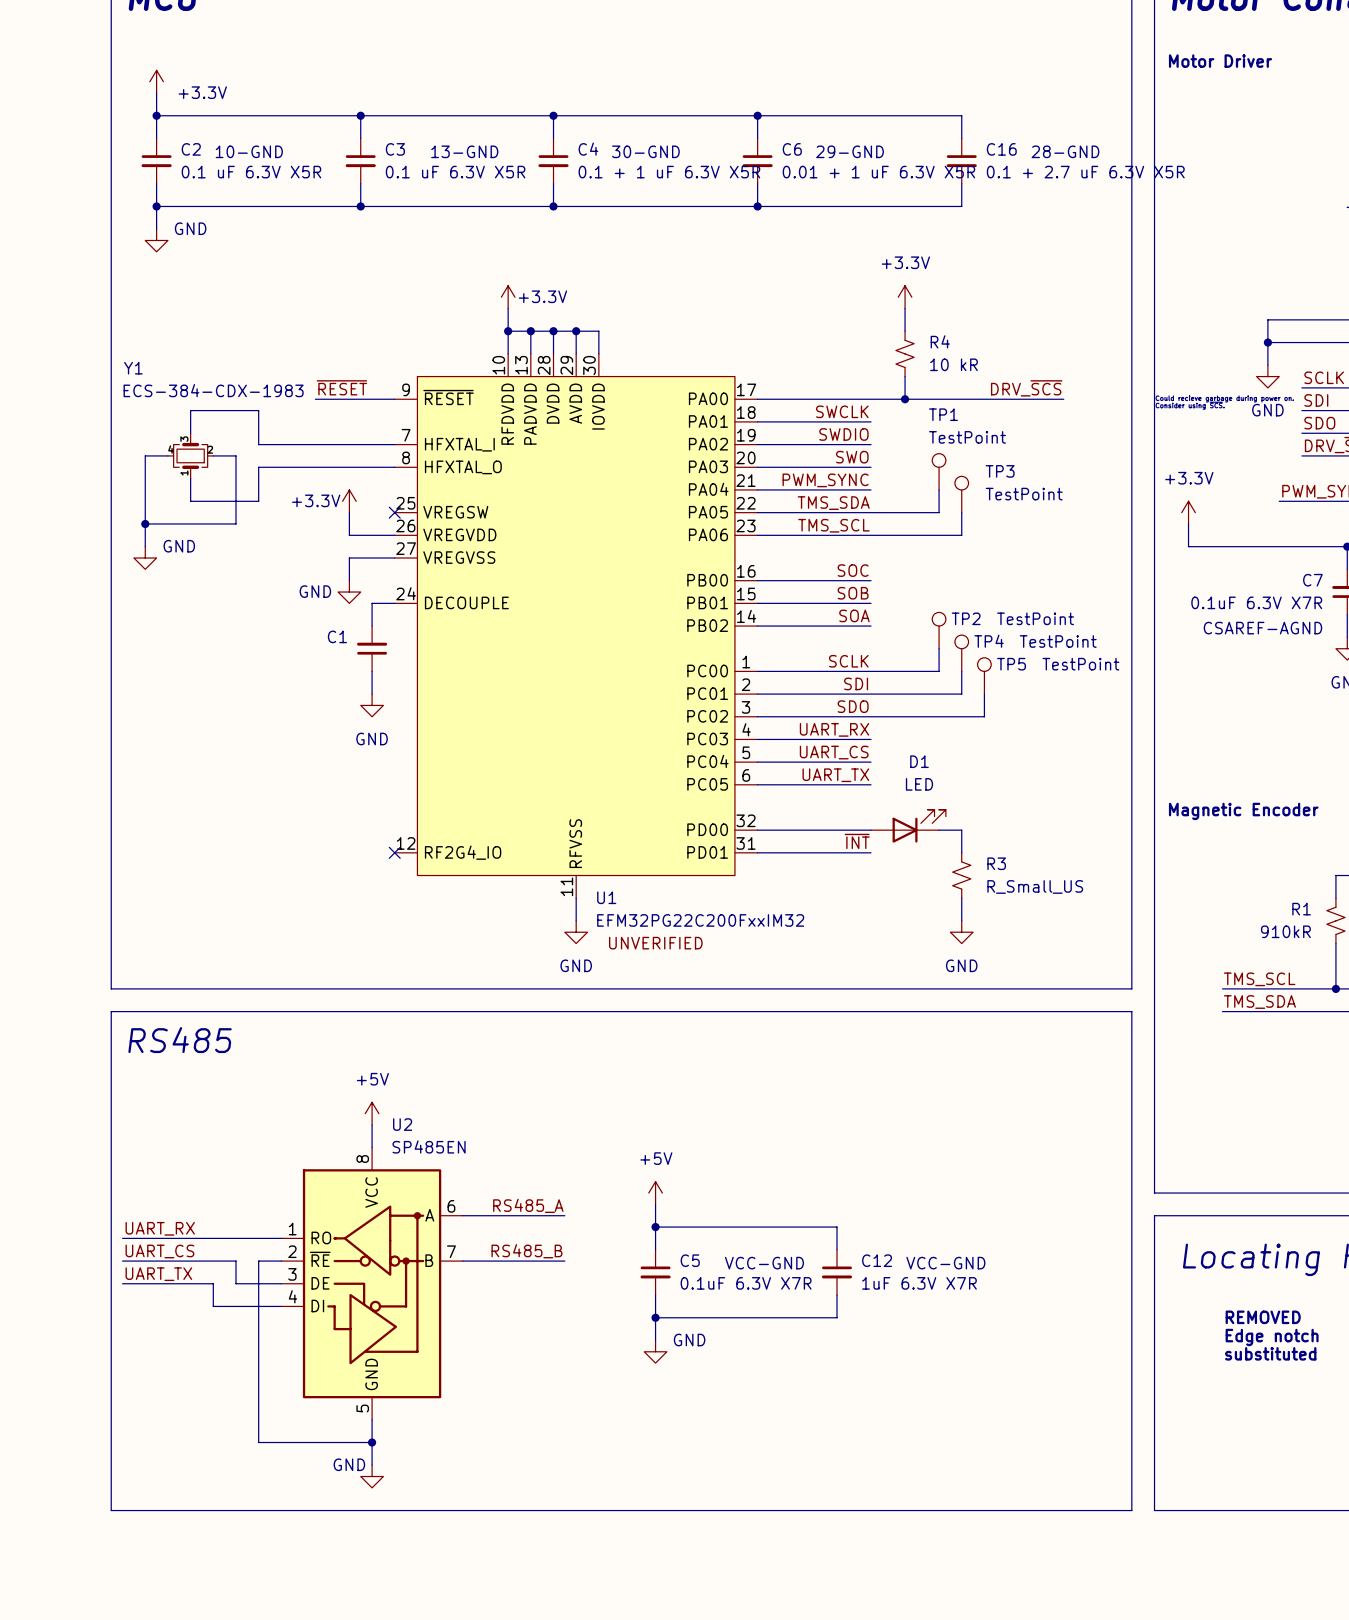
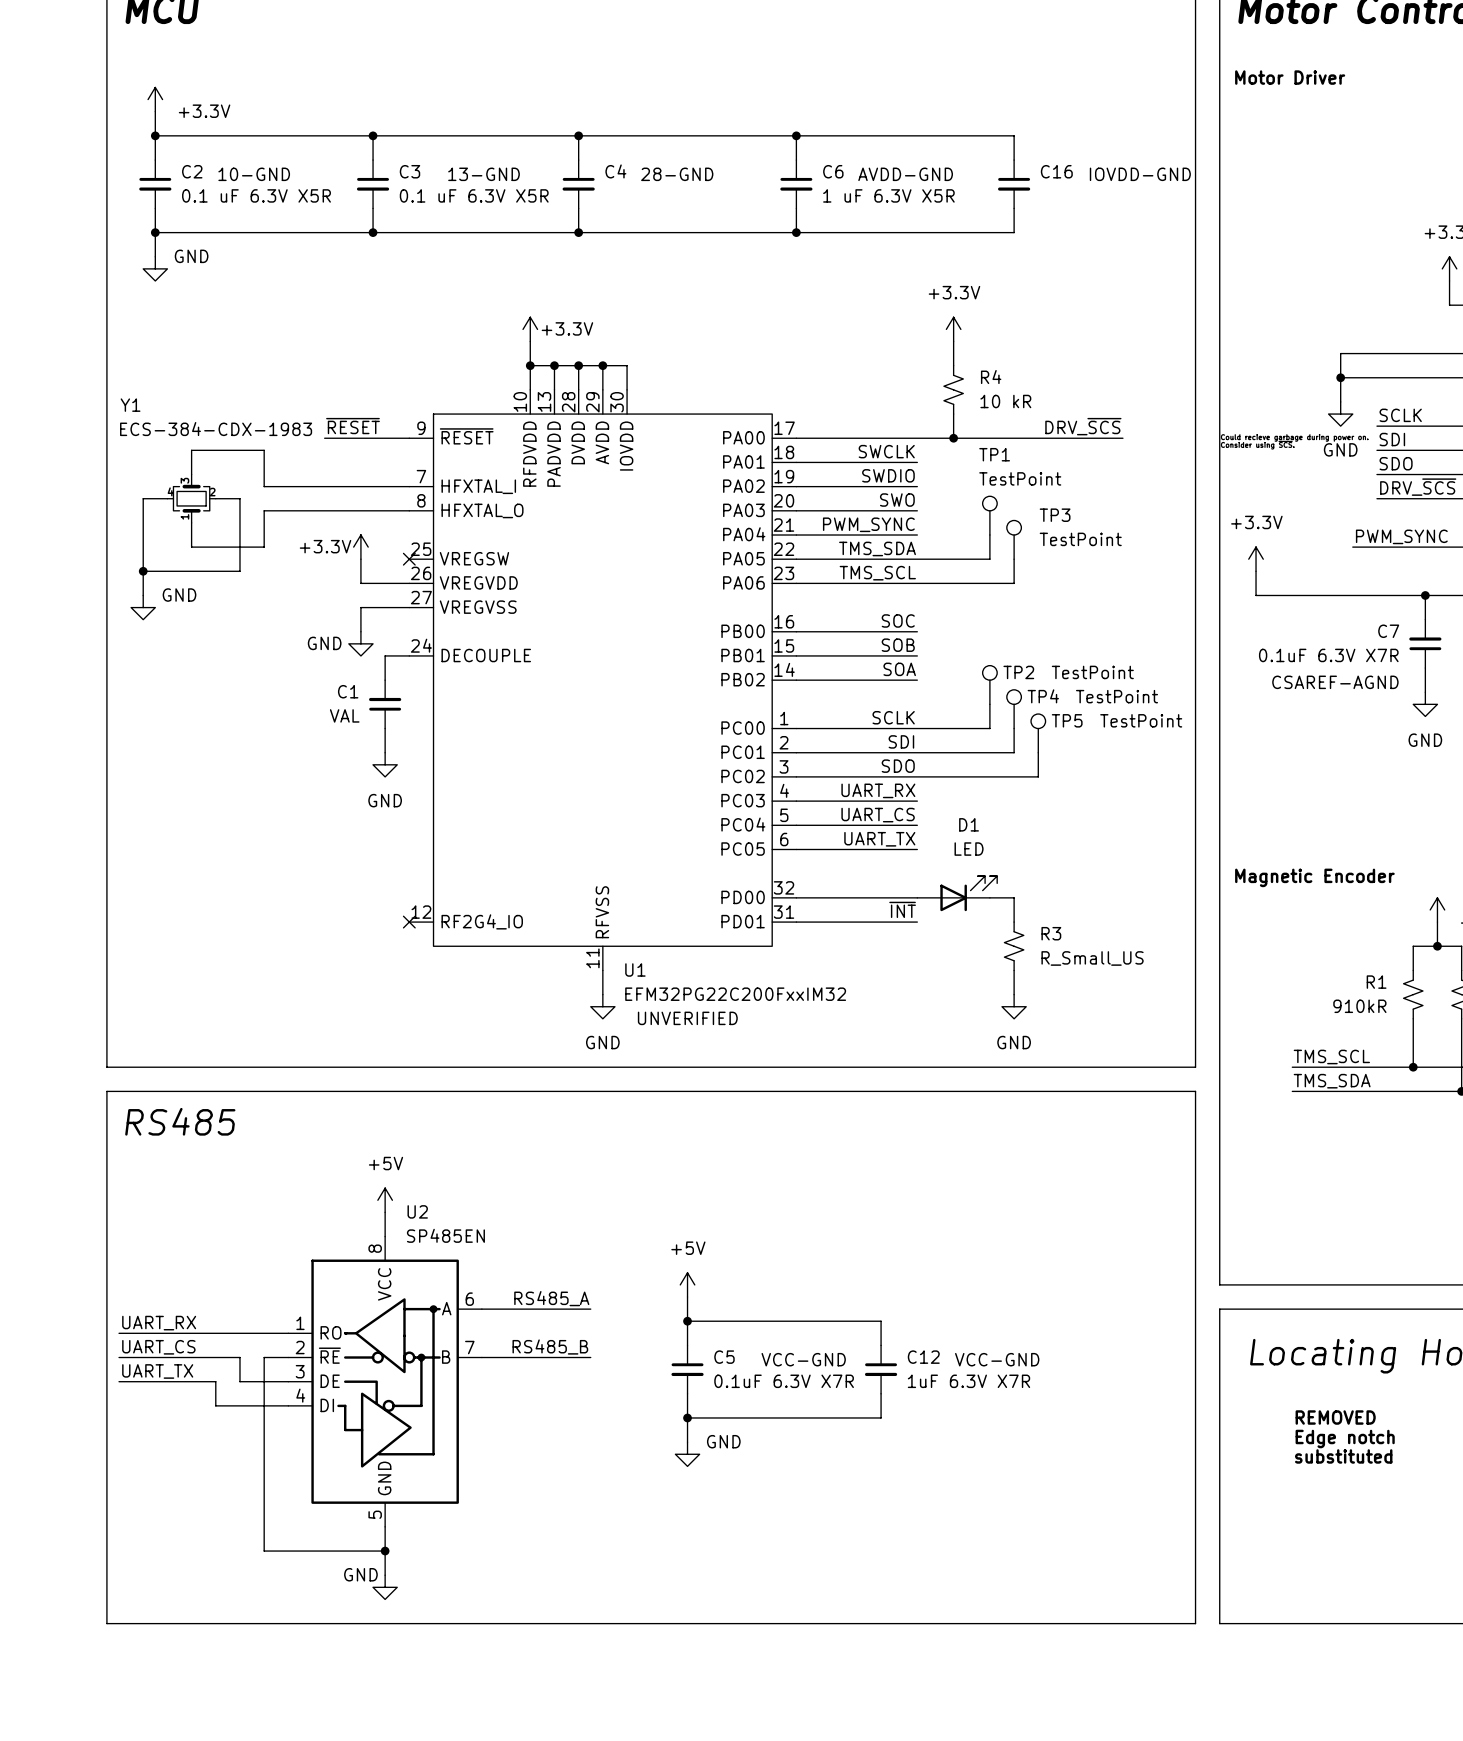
text: 30-GND (645, 151) -> 28-GND (677, 174)
text: 29-GND (850, 151) -> AVDD-GND (905, 174)
text: 28-GND (1065, 151) -> IOVDD-GND (1140, 174)
C4 value: 0.1 + 1 uF 6.3V X5R (669, 172) -> none
C6 value: 0.01 + 1 uF 6.3V X5R (878, 172) -> 1 uF 6.3V X5R (888, 195)
C16 value: 0.1 + 2.7 uF 6.3V X5R (1085, 172) -> none
C1 value: none -> VAL (344, 715)

